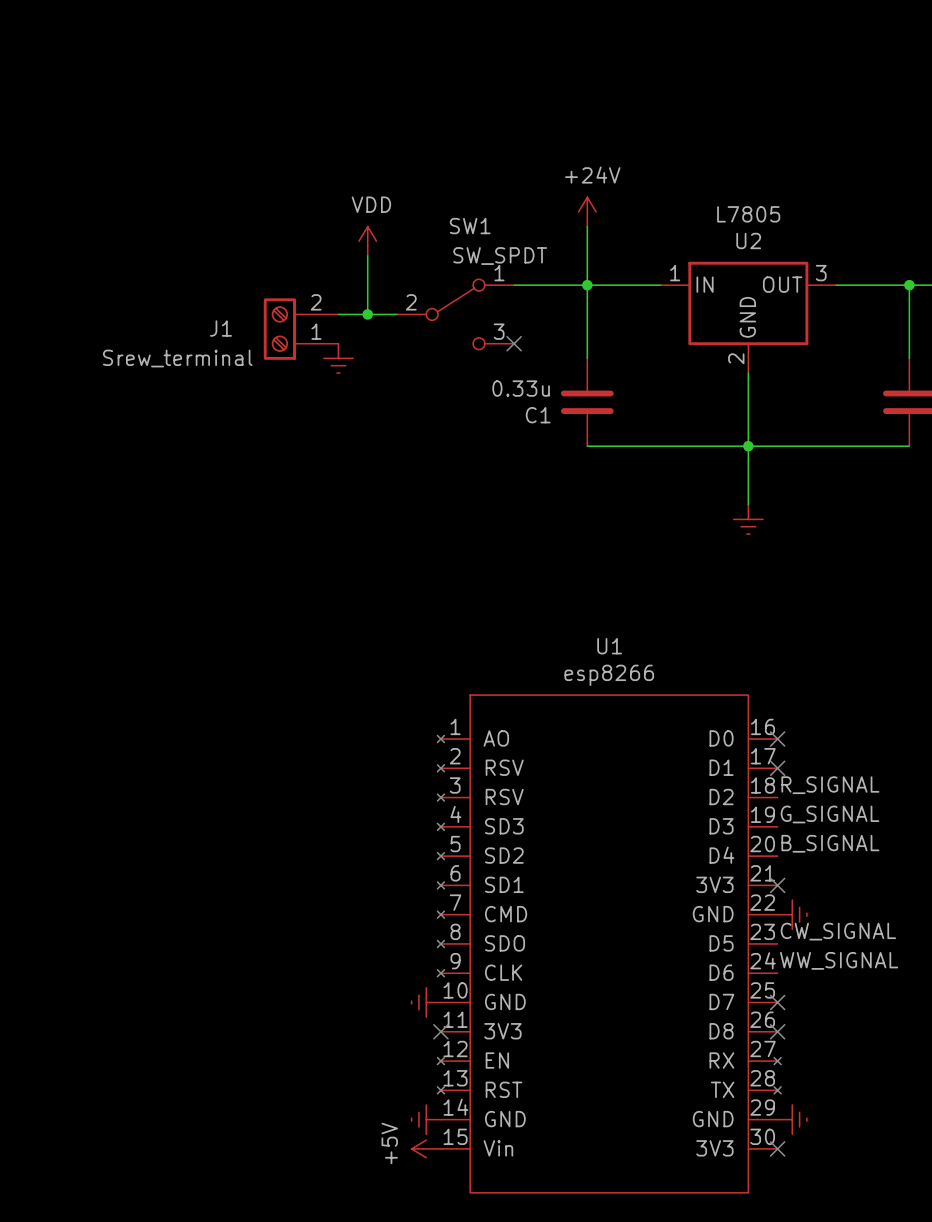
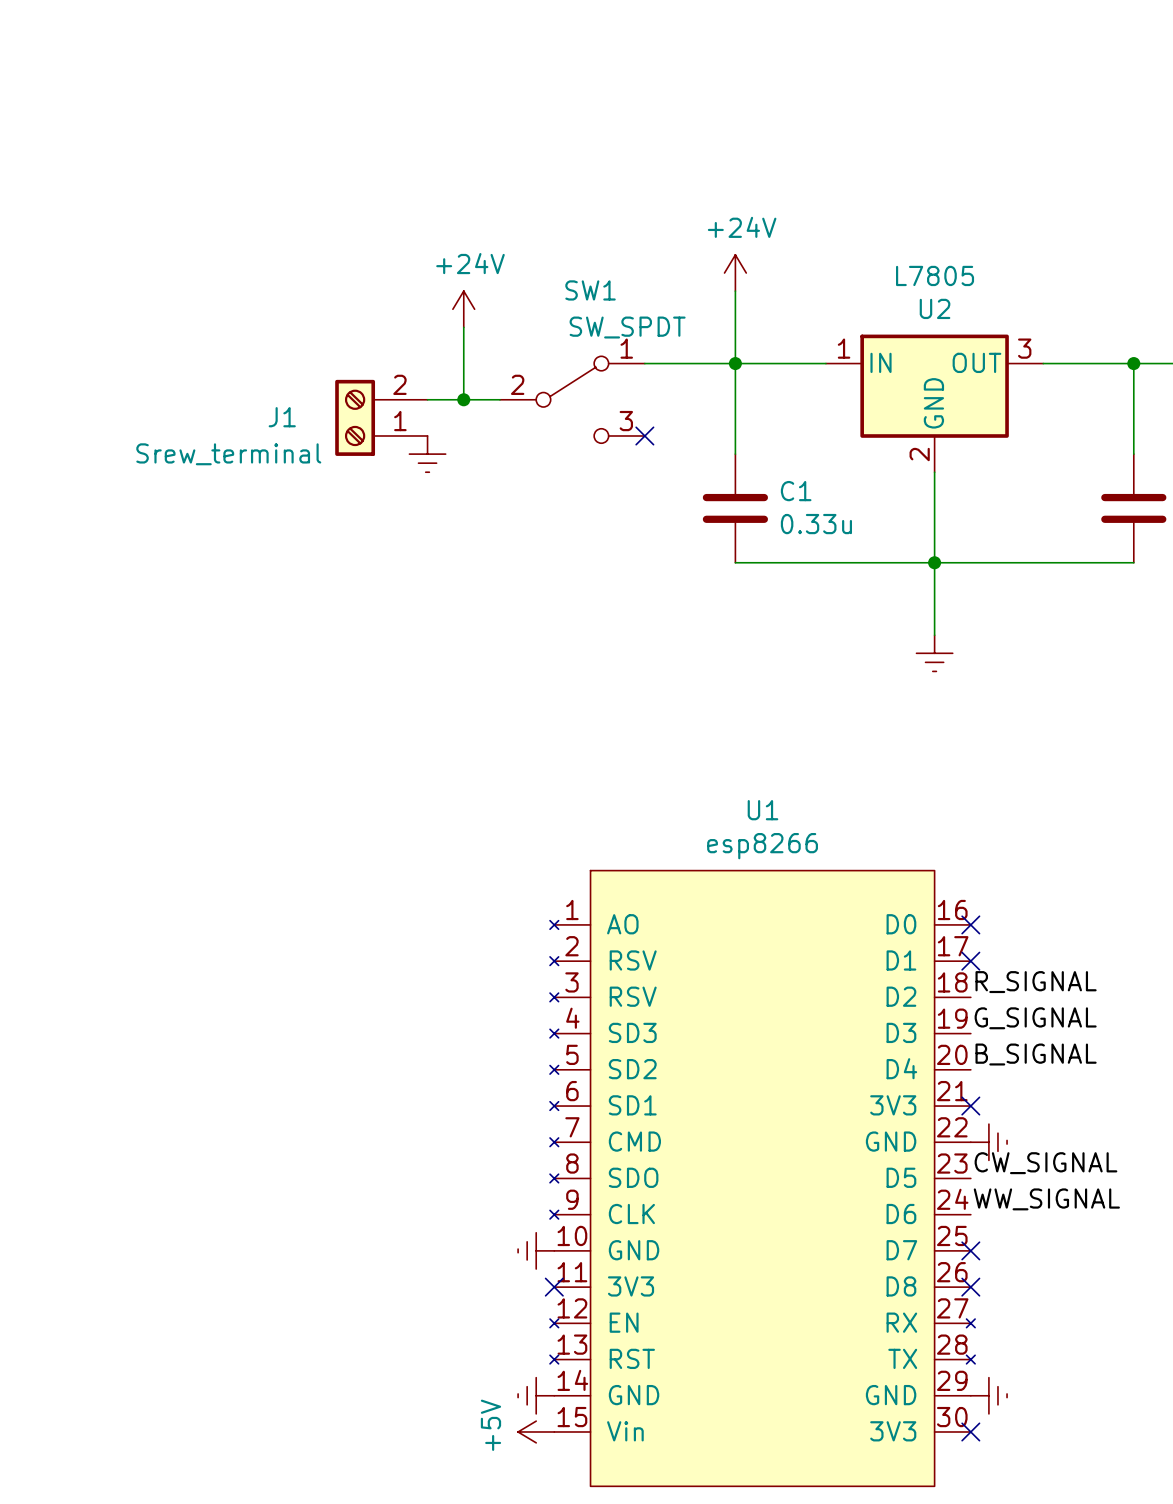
power symbol: VDD (367, 241) -> +24V (463, 309)
C1 value position: 0.33u (521, 388) -> 0.33u (816, 524)
C1 name position: C1 (538, 415) -> C1 (796, 491)

